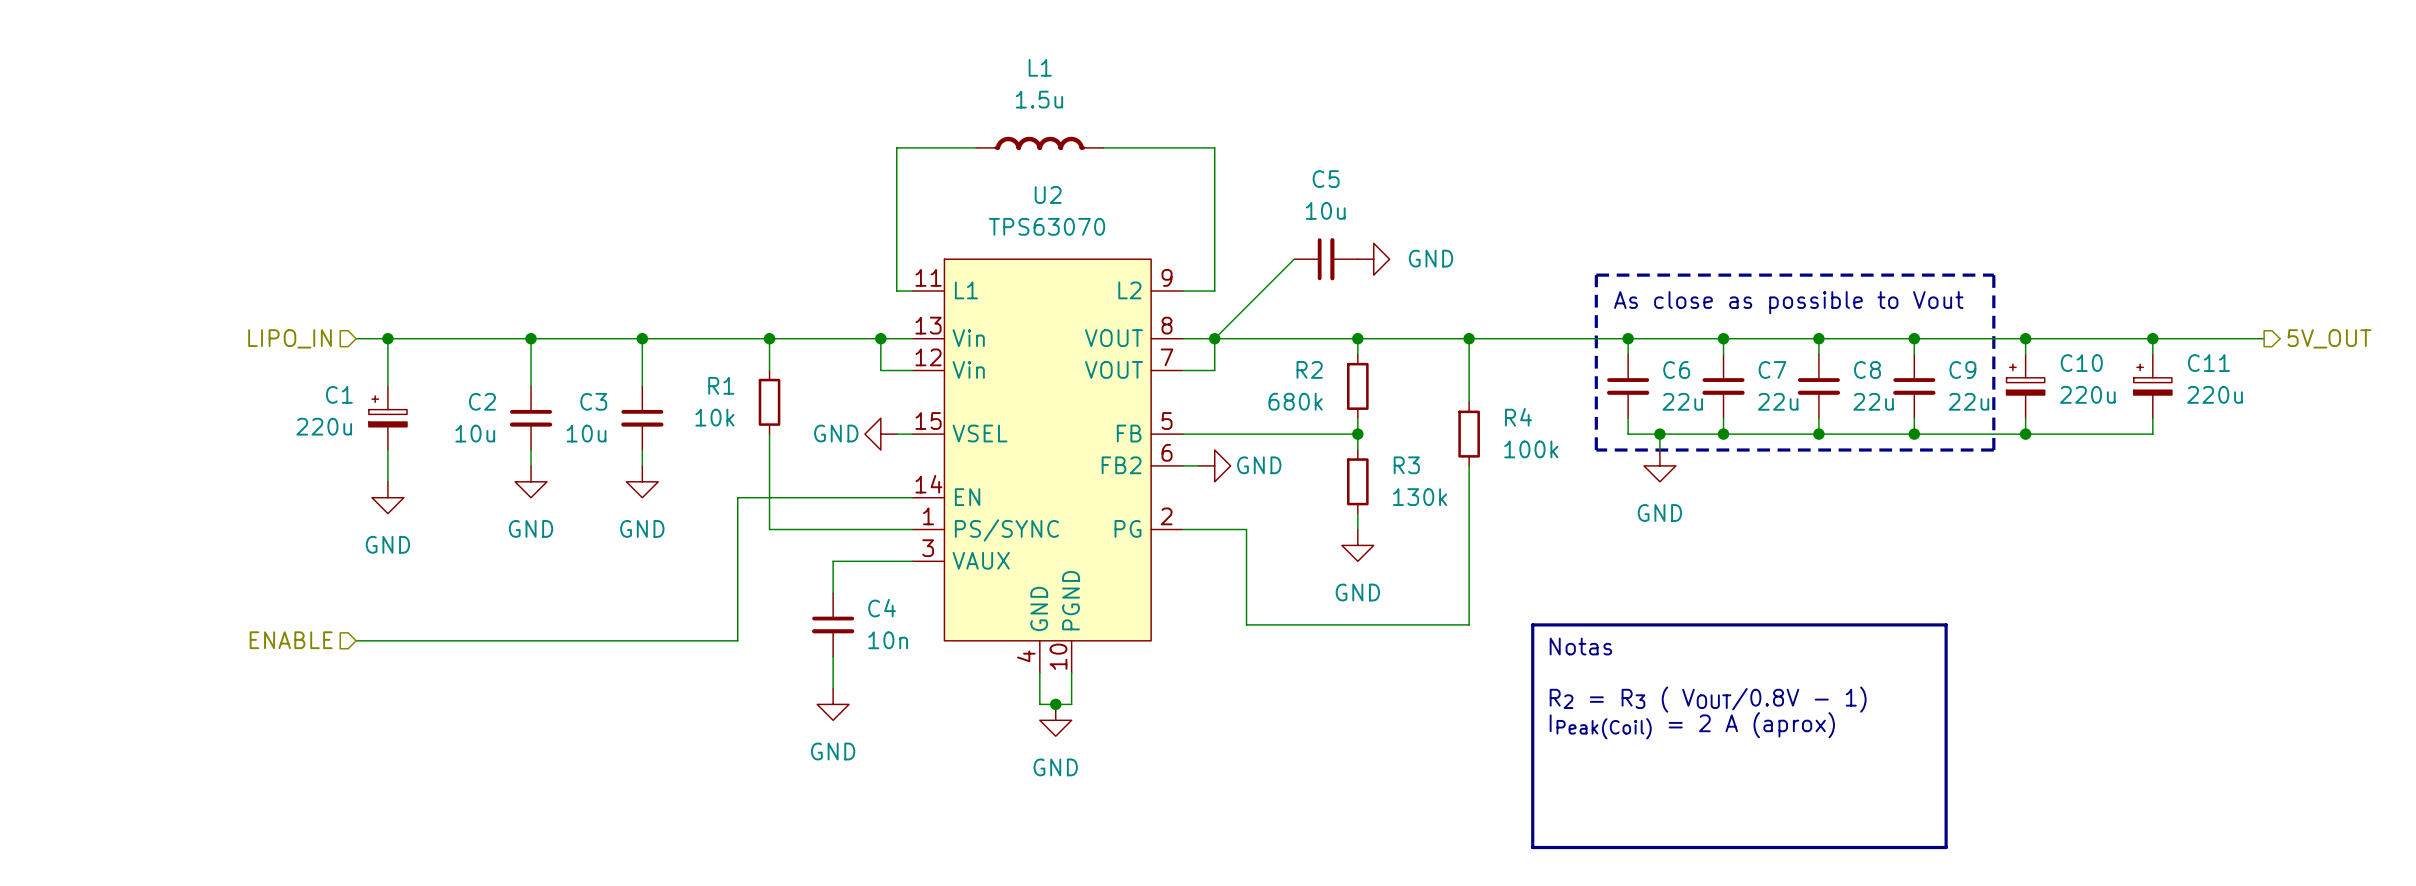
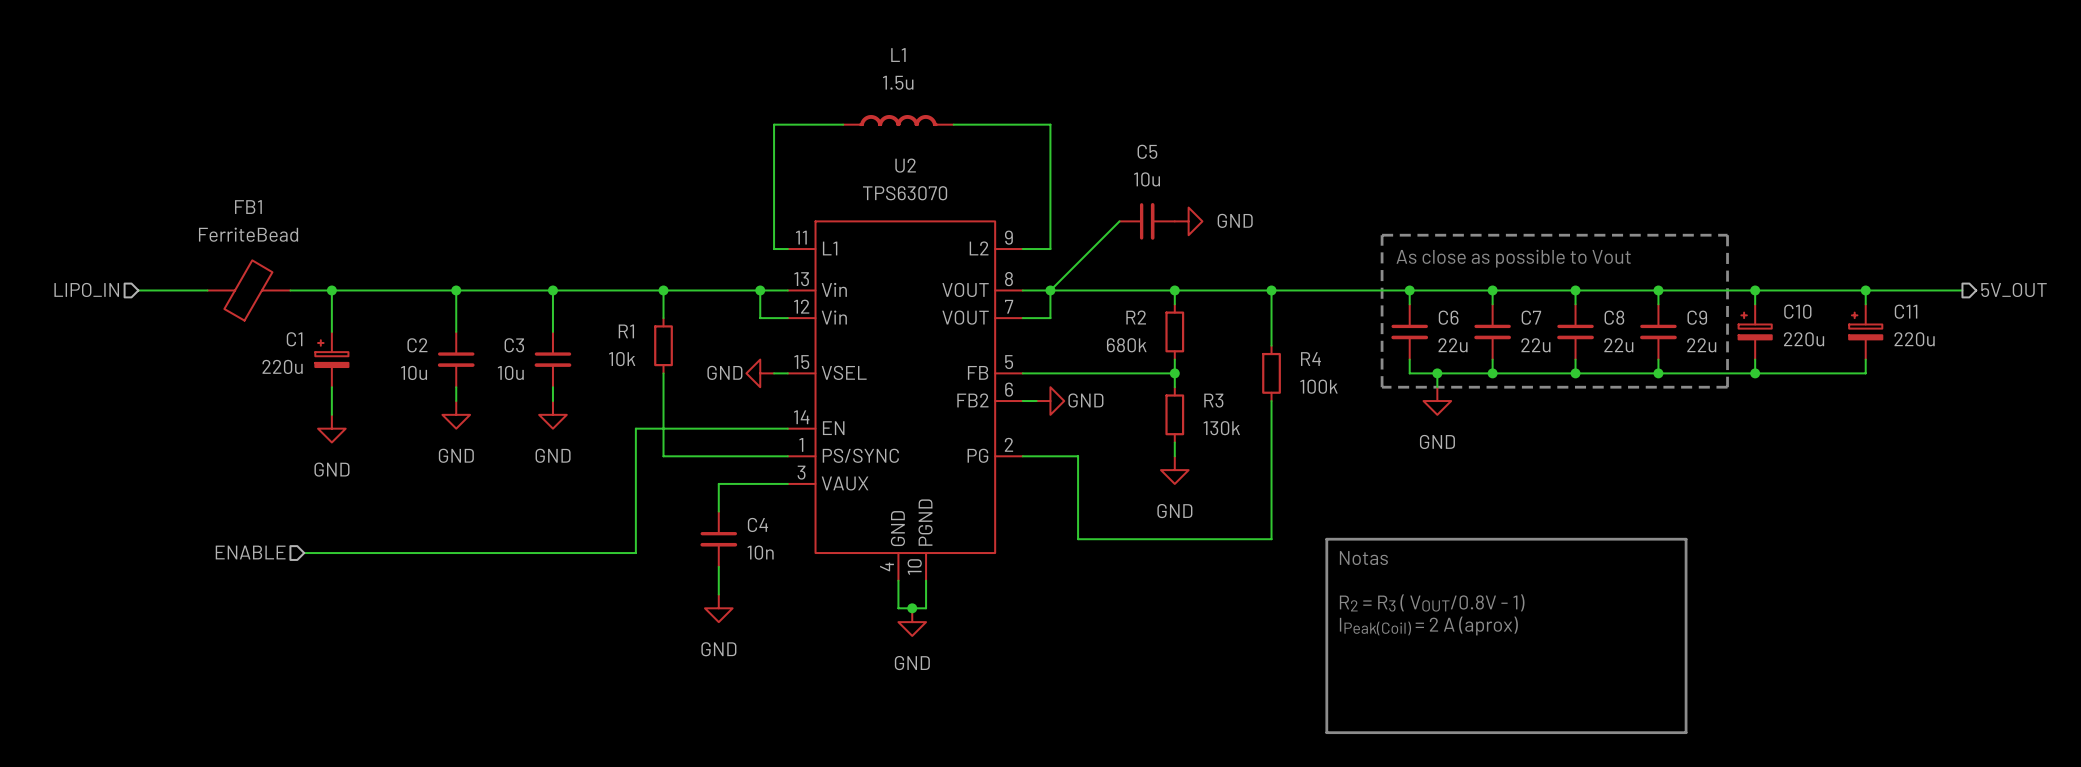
wire: none -> (138, 290) (207, 290)
hierarchical label position: LIPO_IN (290, 338) -> LIPO_IN (86, 289)
FB1: none -> FerriteBead (248, 290)
wire: none -> (290, 290) (304, 290)

